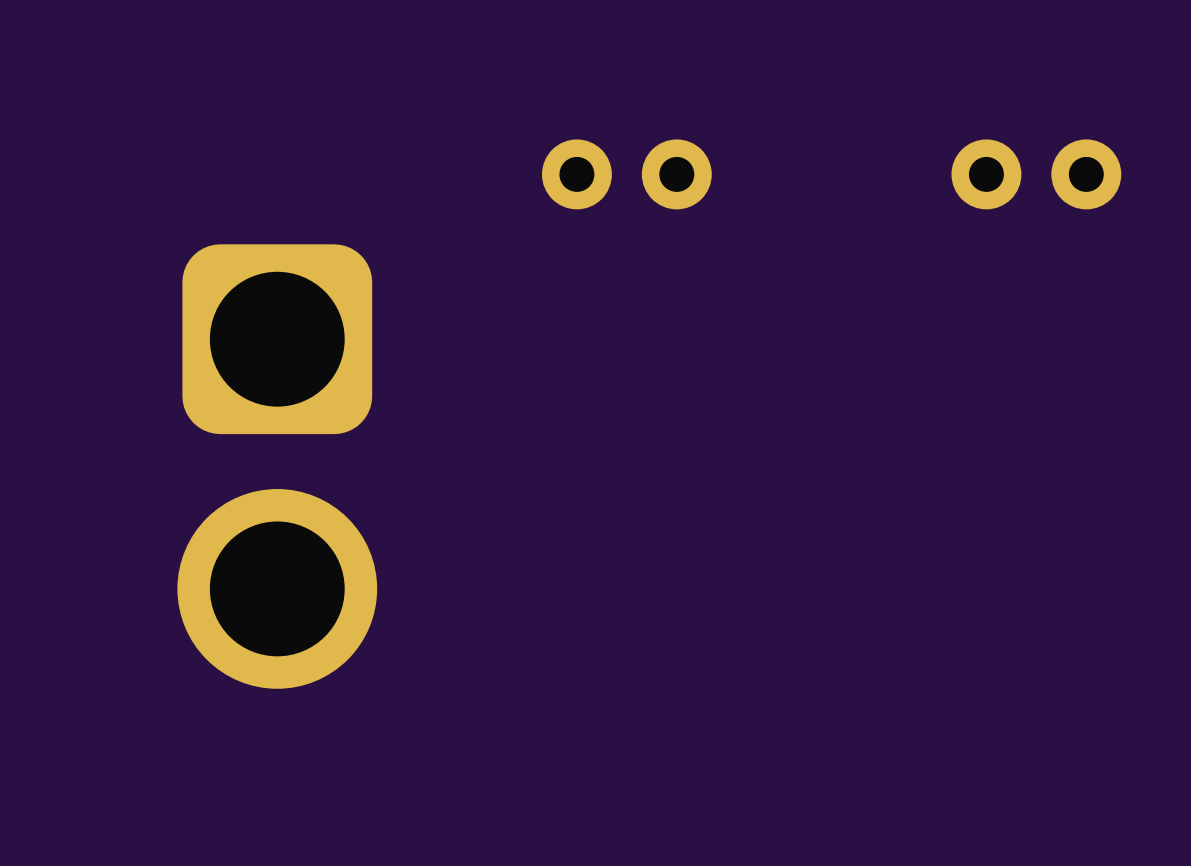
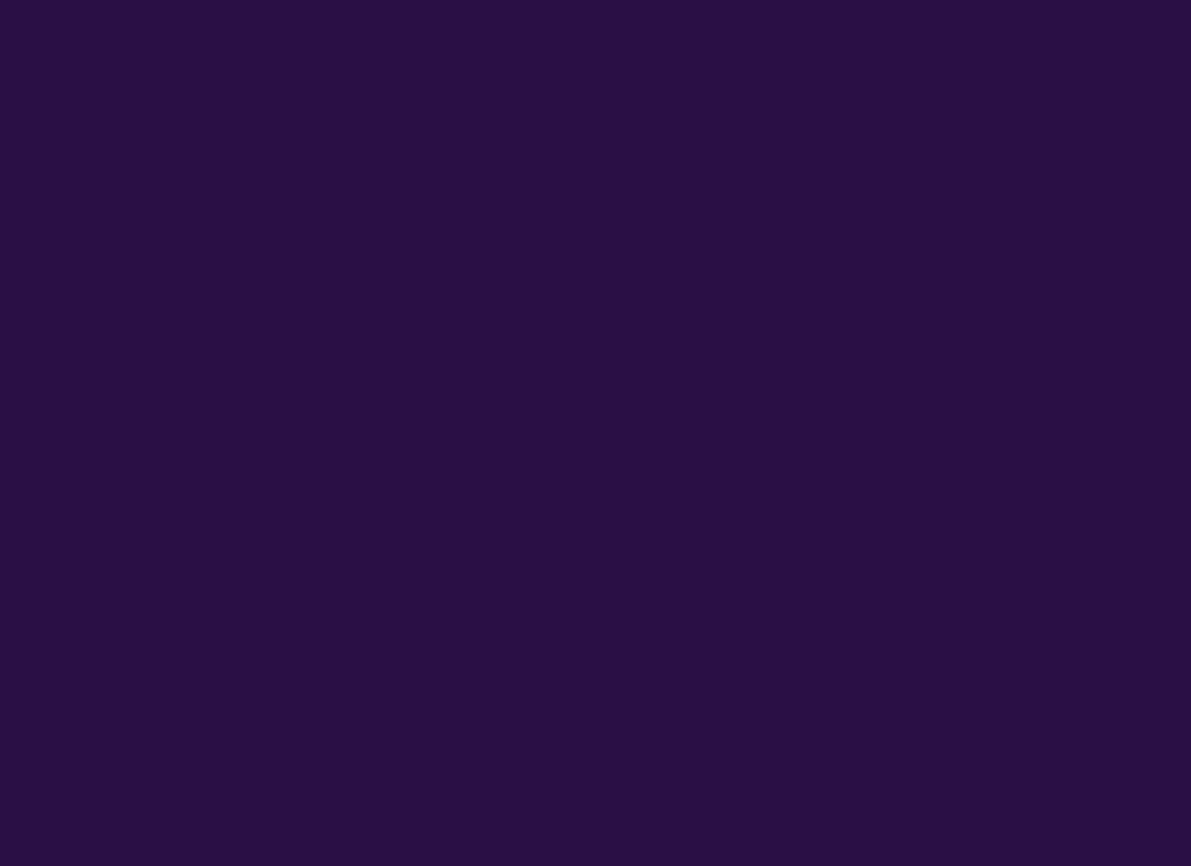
part: (626, 174) -> none
part: (1036, 174) -> none
part: (277, 466) -> none

